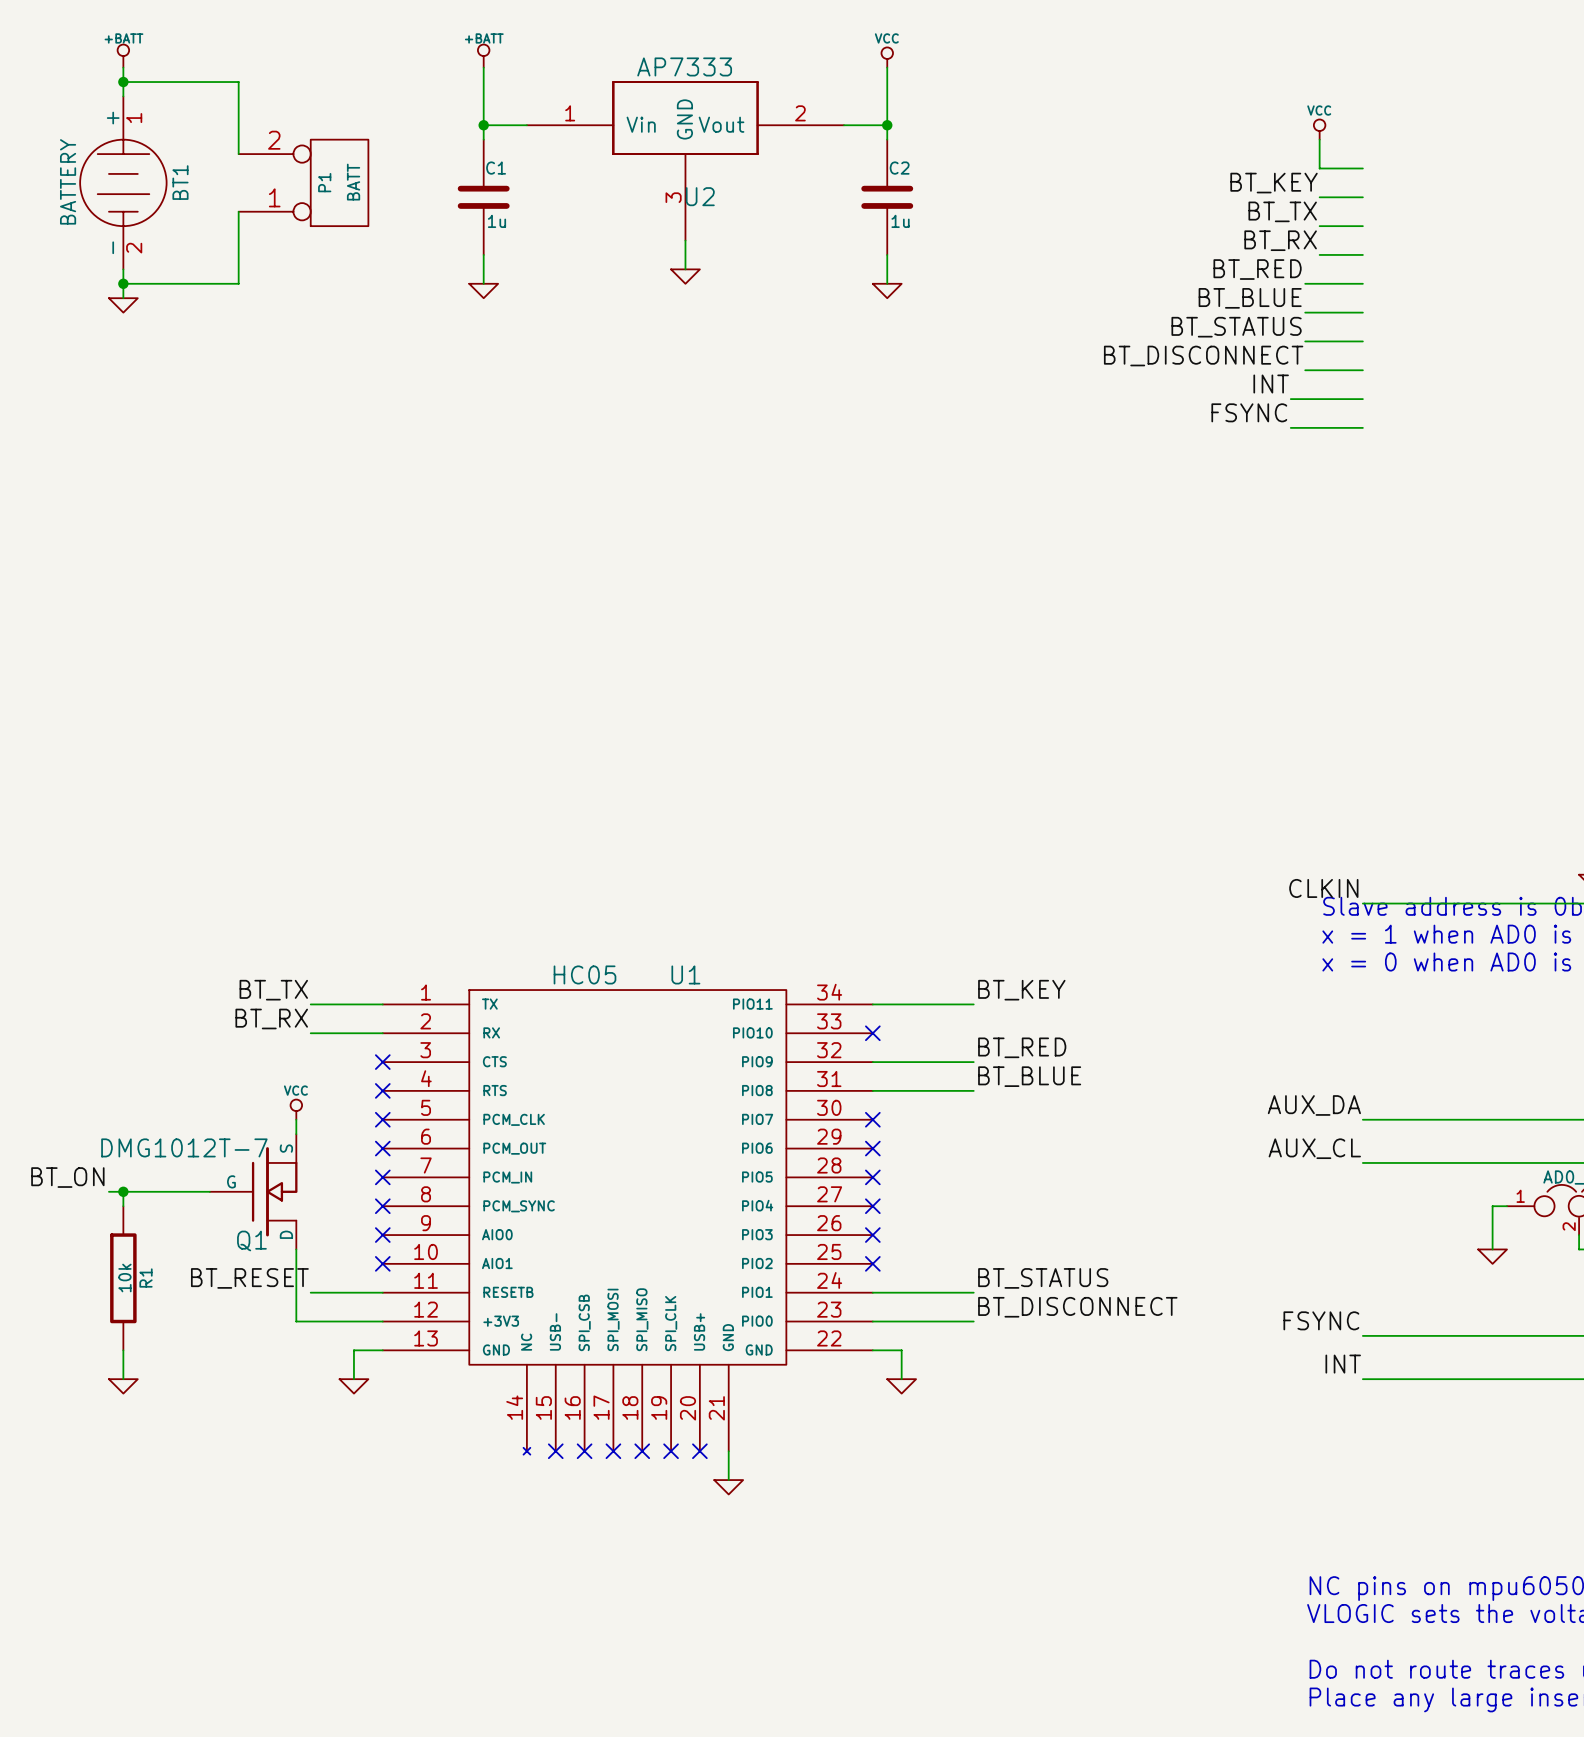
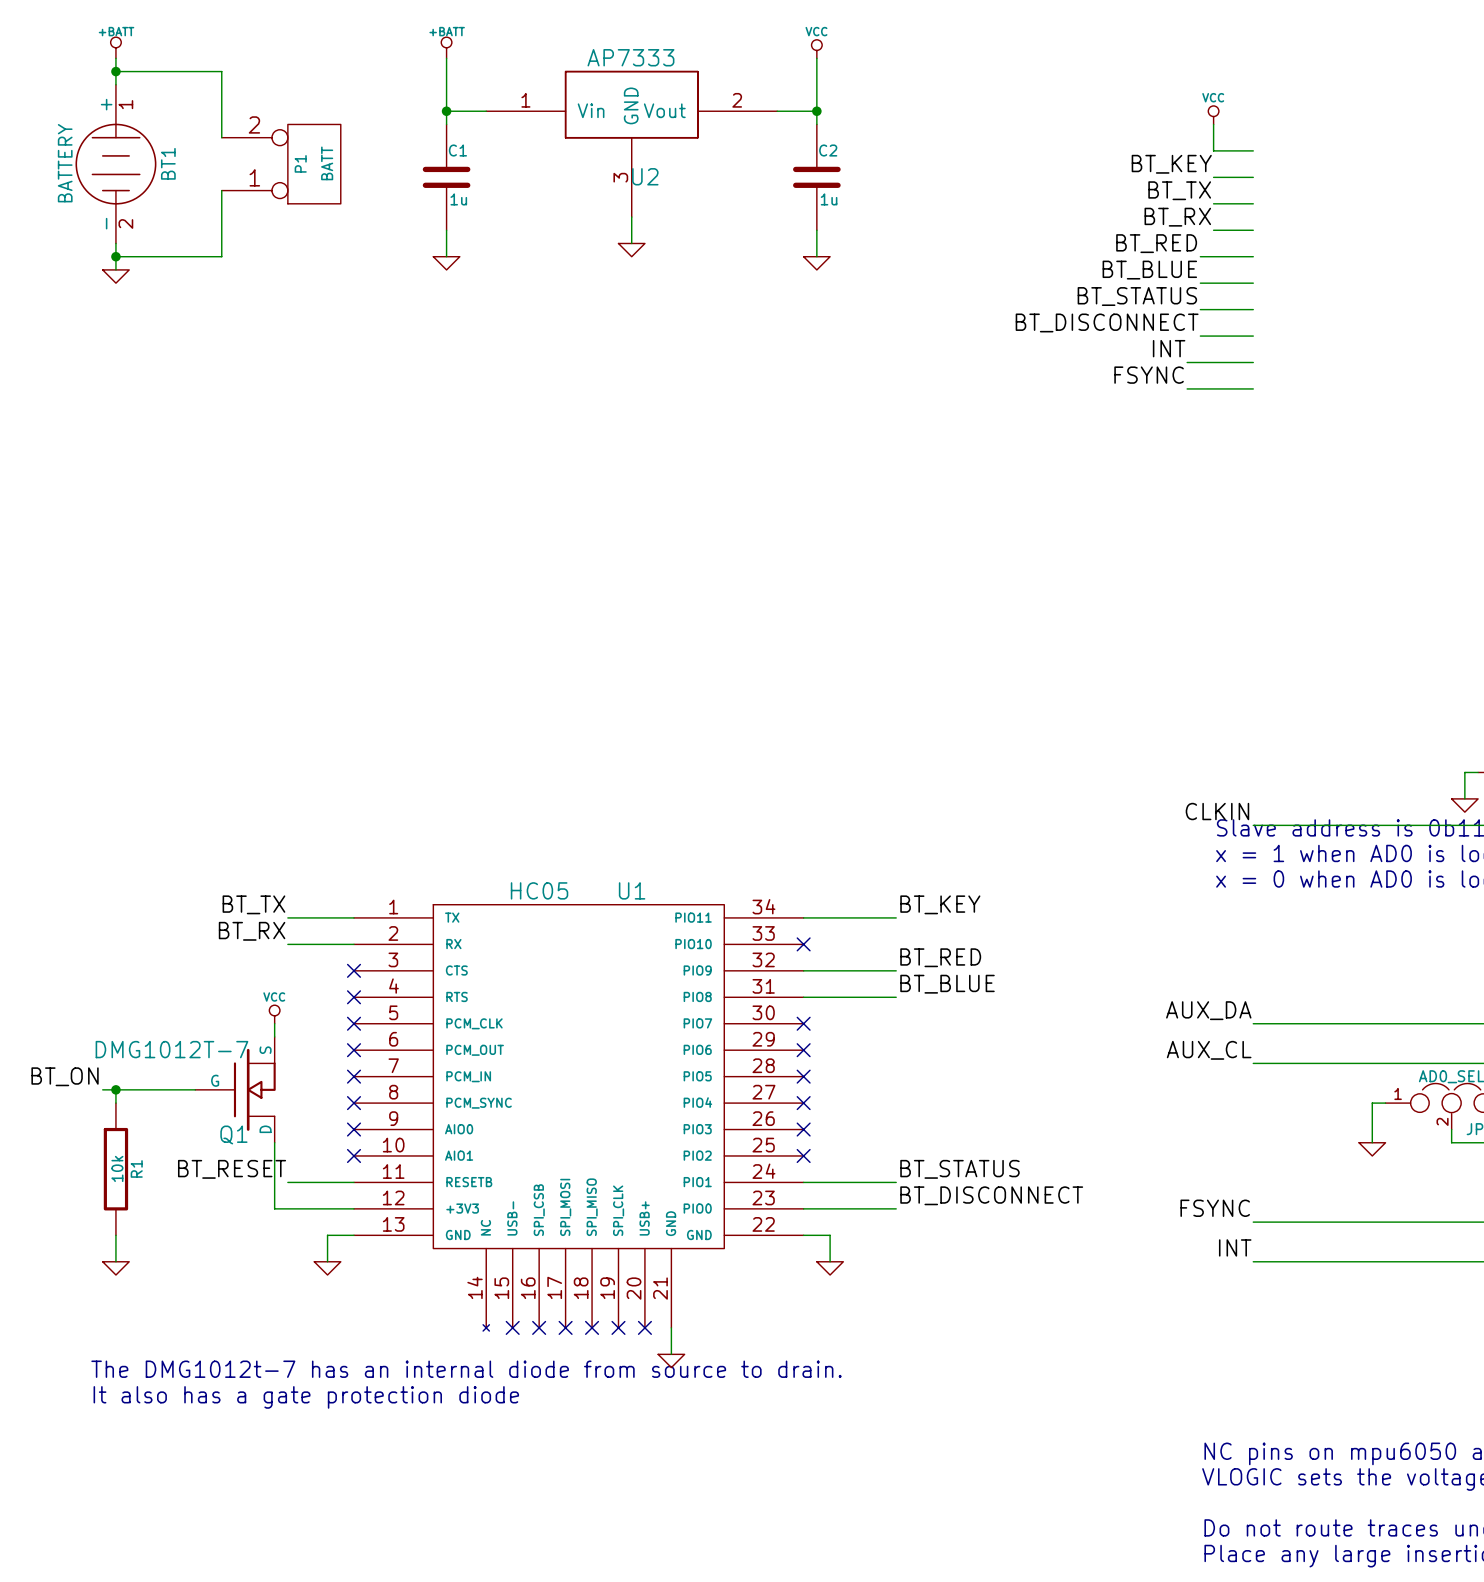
text: none -> The DMG1012t-7 has an internal diode from source to drain. (466, 1369)
text: none -> It also has a gate protection diode (306, 1397)

